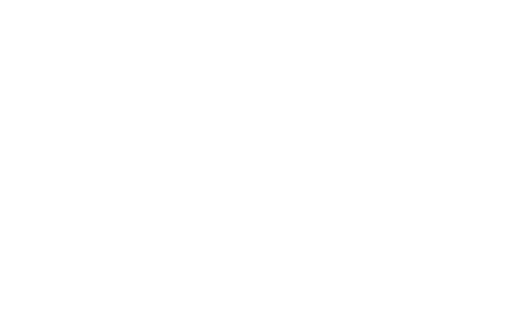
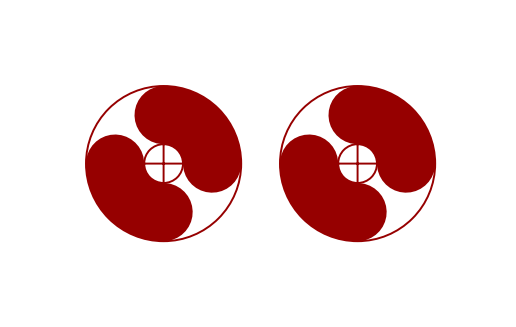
part: none -> (163, 163)
part: none -> (357, 163)

